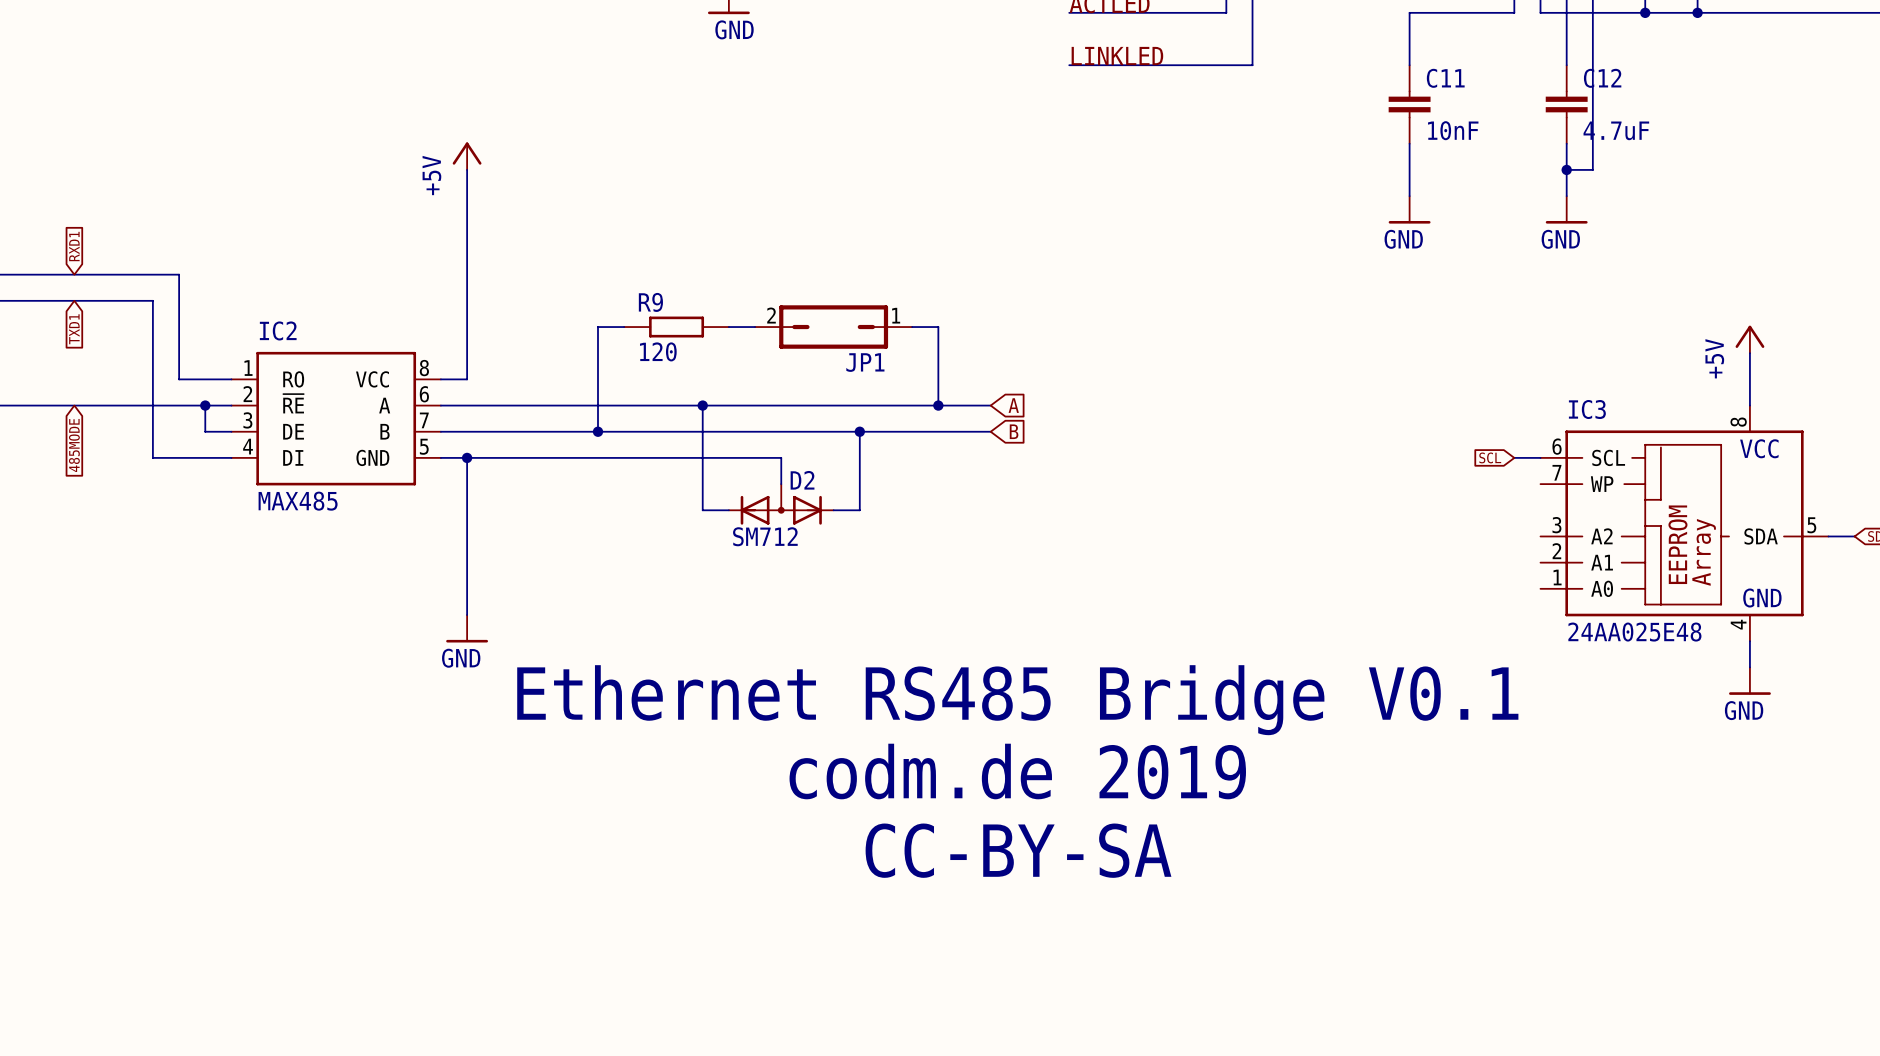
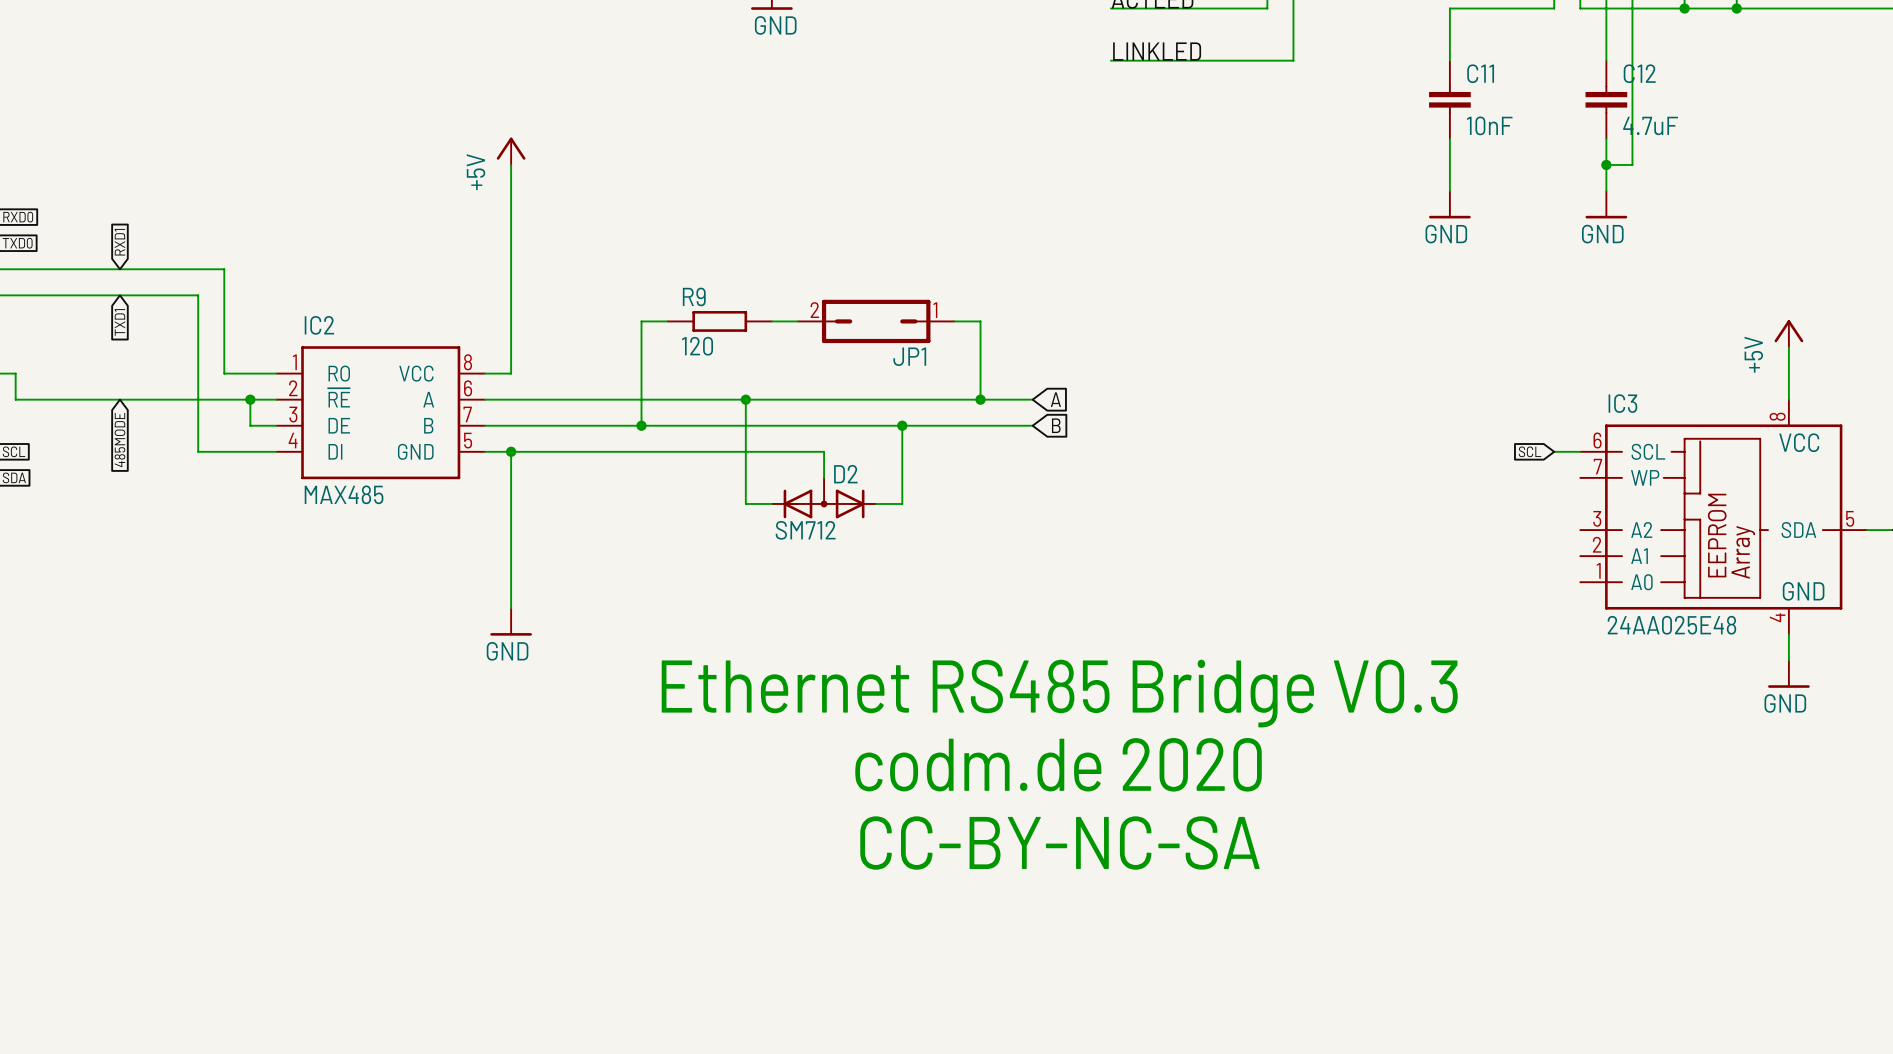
text: Ethernet RS485 Bridge V0.1 (1017, 700) -> Ethernet RS485 Bridge V0.3 (1059, 693)
text: codm.de 2019 (1017, 771) -> codm.de 2020 (1058, 764)
text: CC-BY-SA (1018, 850) -> CC-BY-NC-SA (1059, 843)

